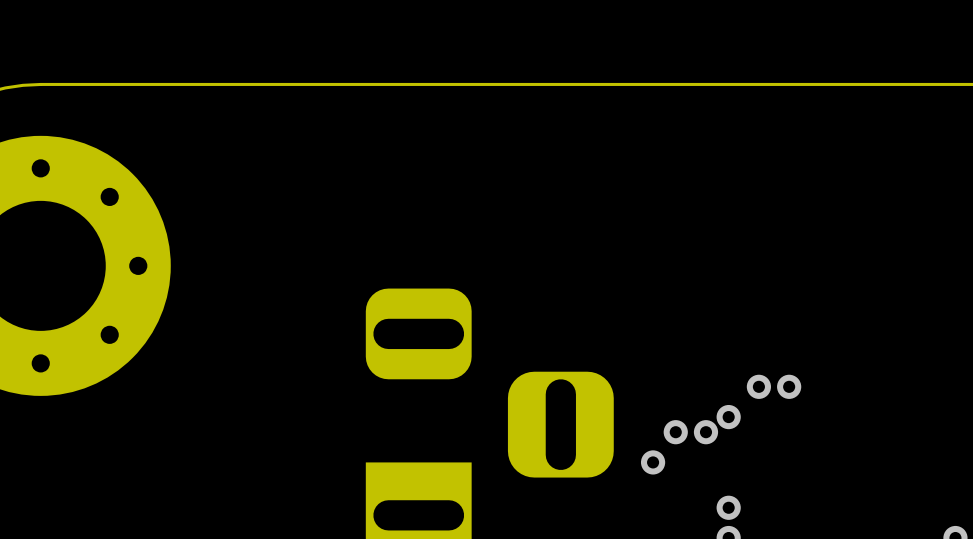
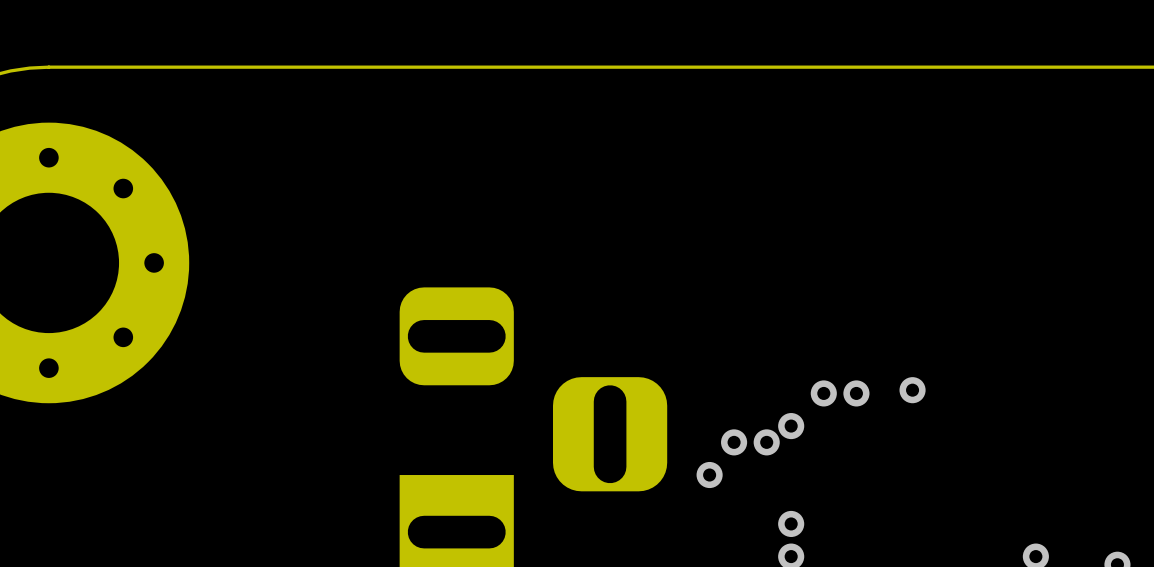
via: none -> (912, 390)

